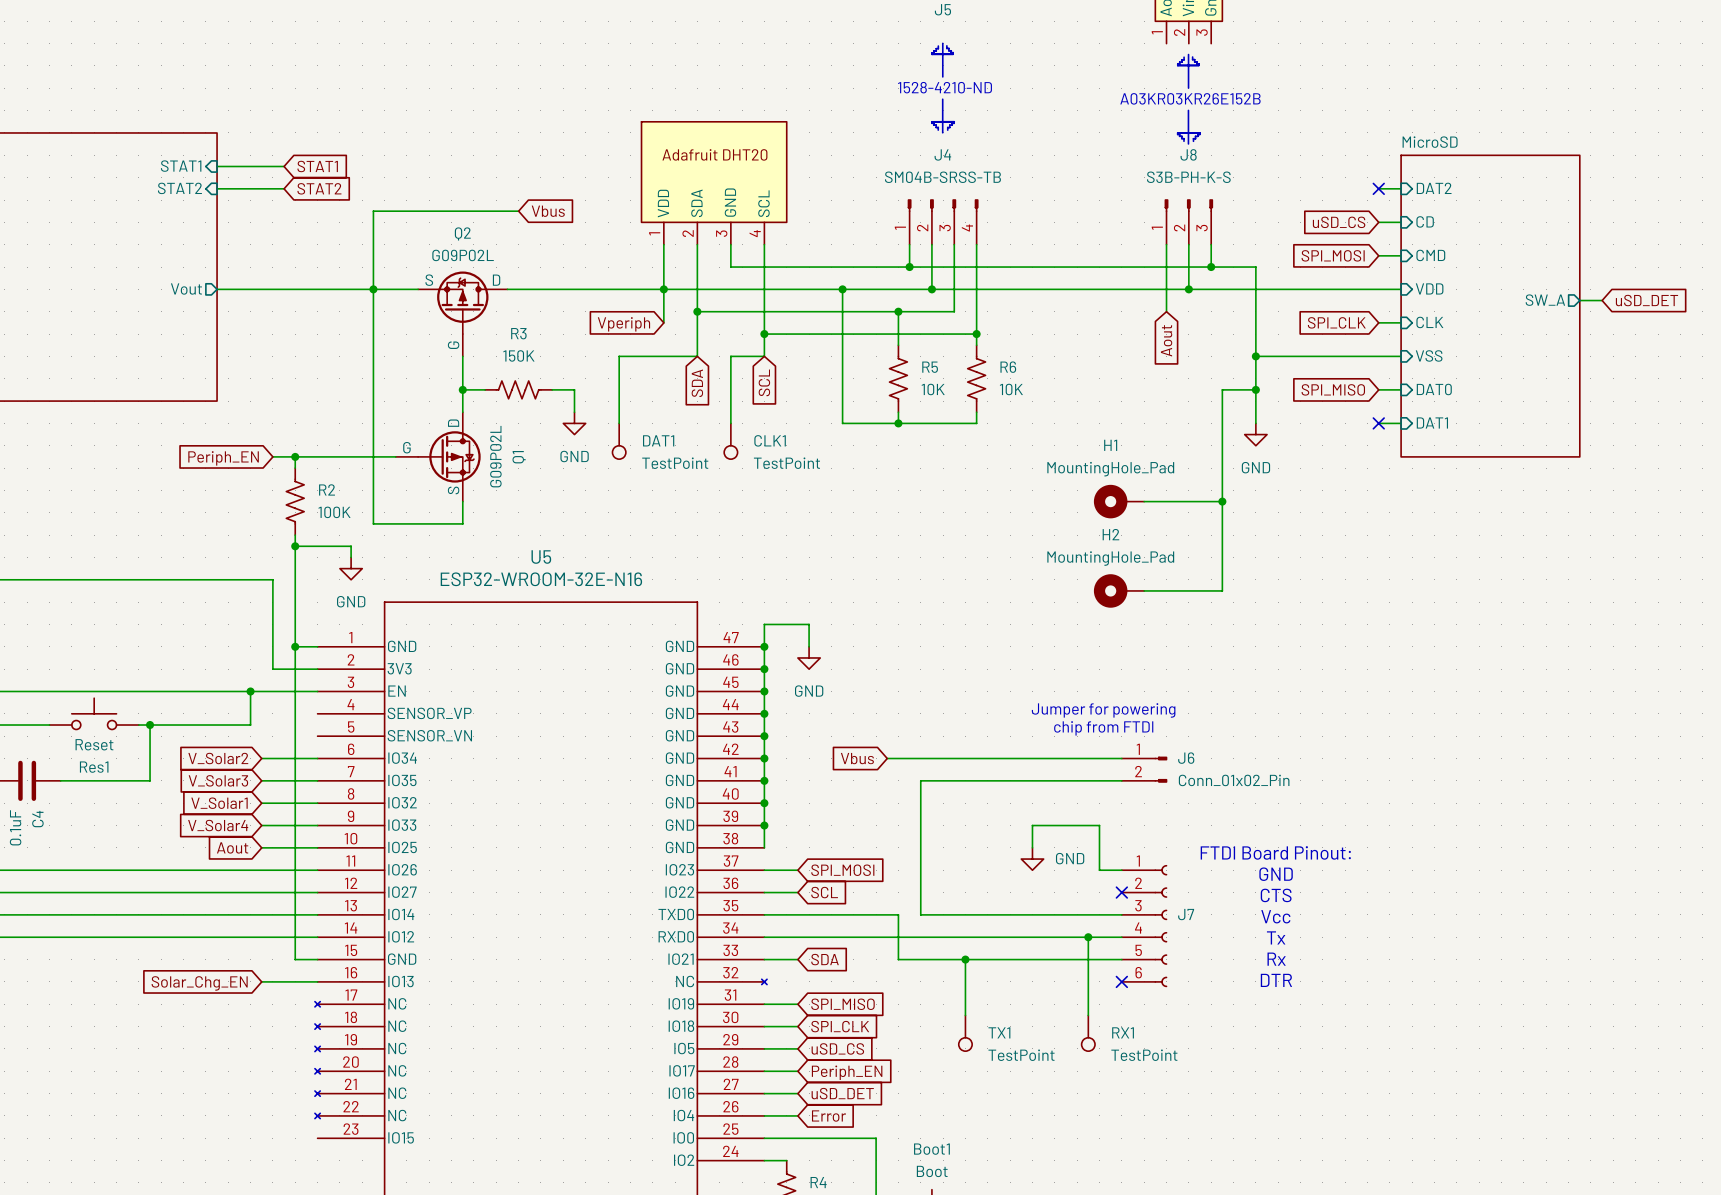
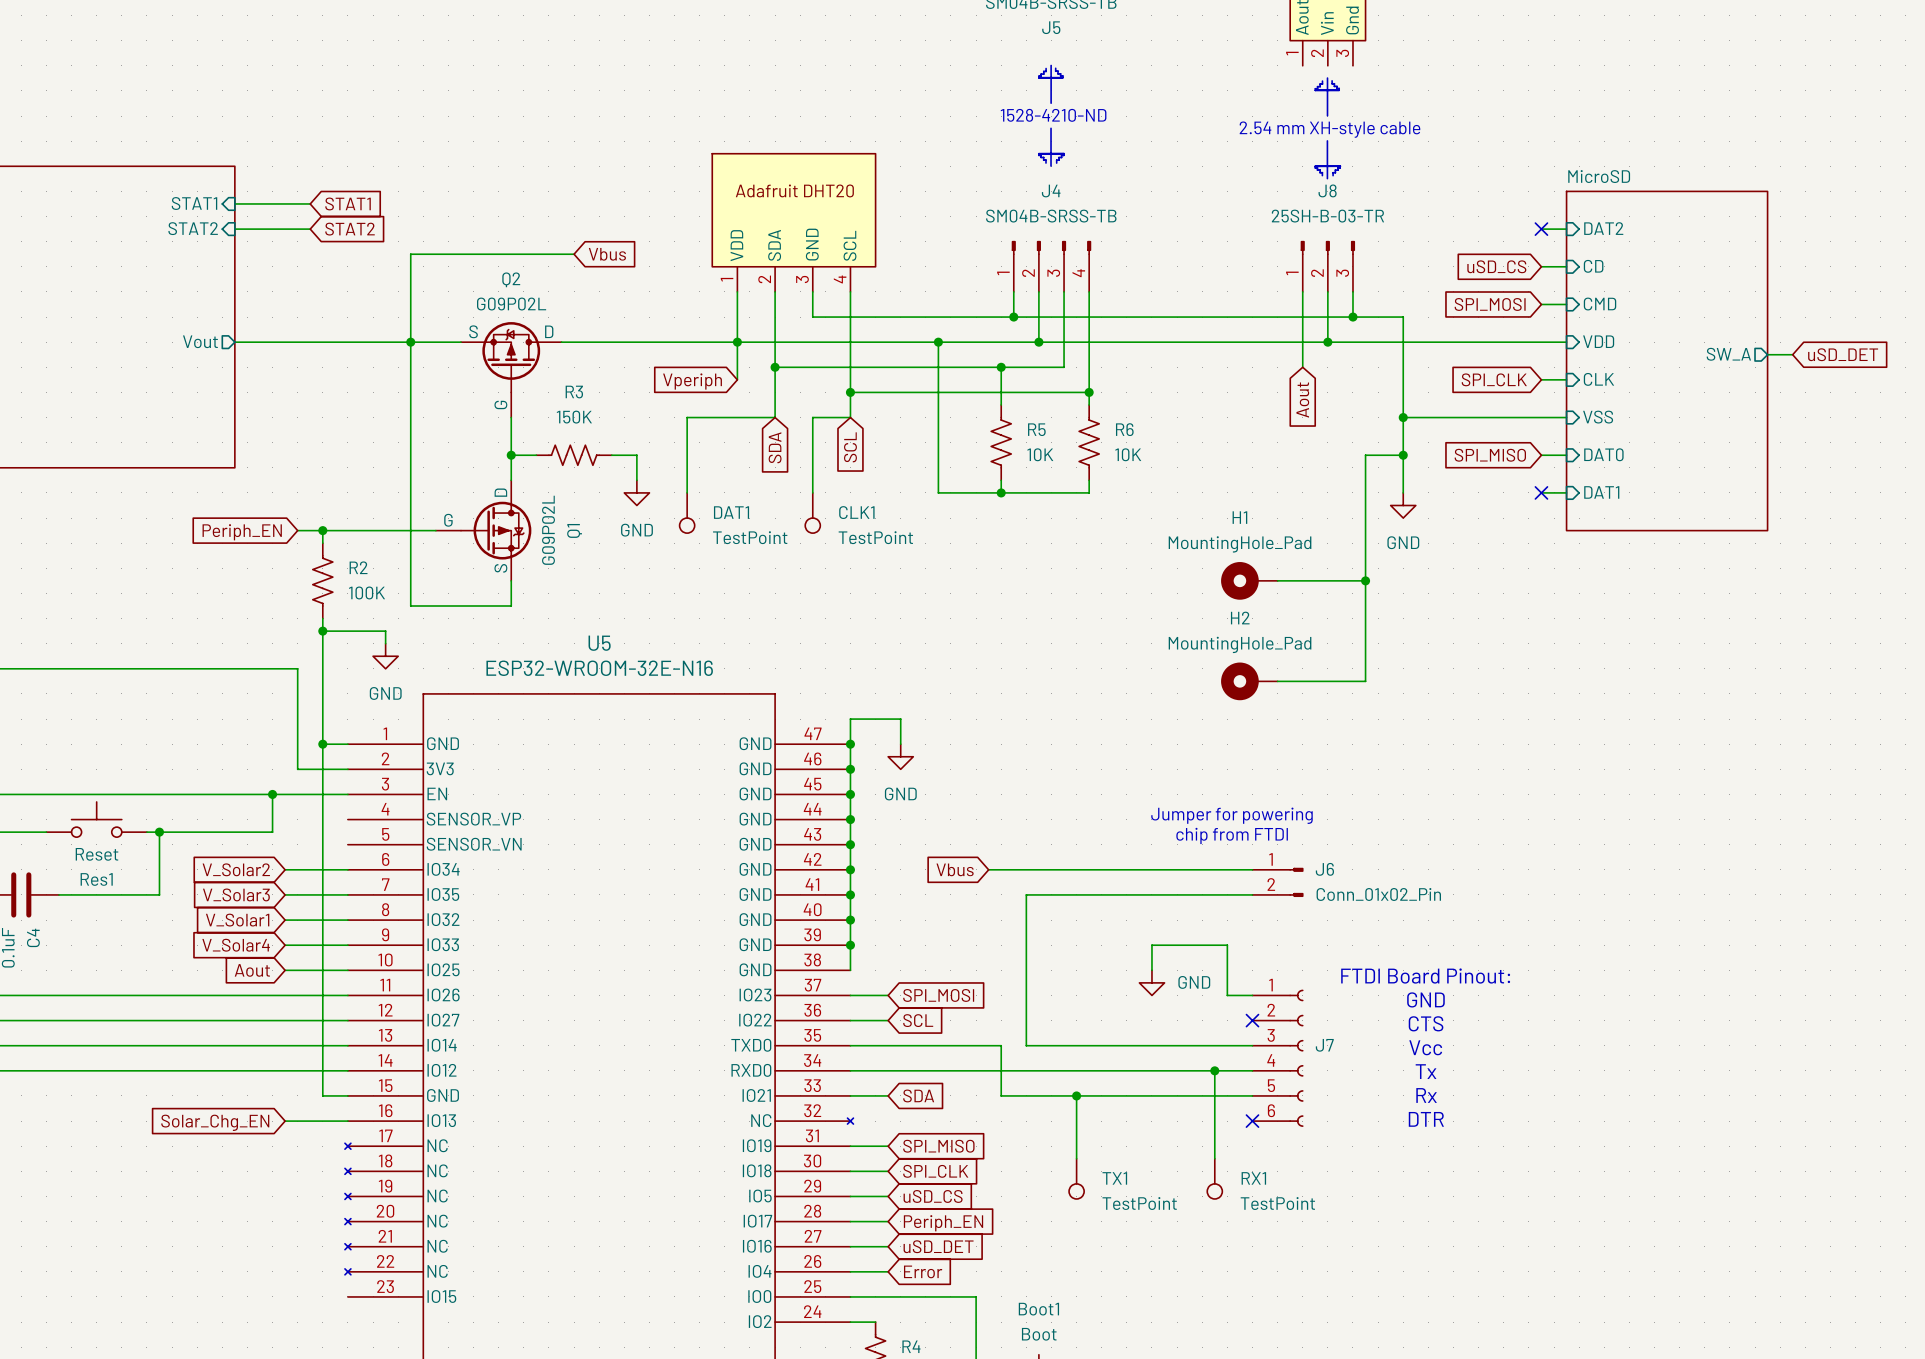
text: A03KR03KR26E152B (1190, 98) -> 2.54 mm XH-style cable (1329, 129)
J8 value: S3B-PH-K-S (1188, 177) -> 25SH-B-03-TR (1327, 216)

